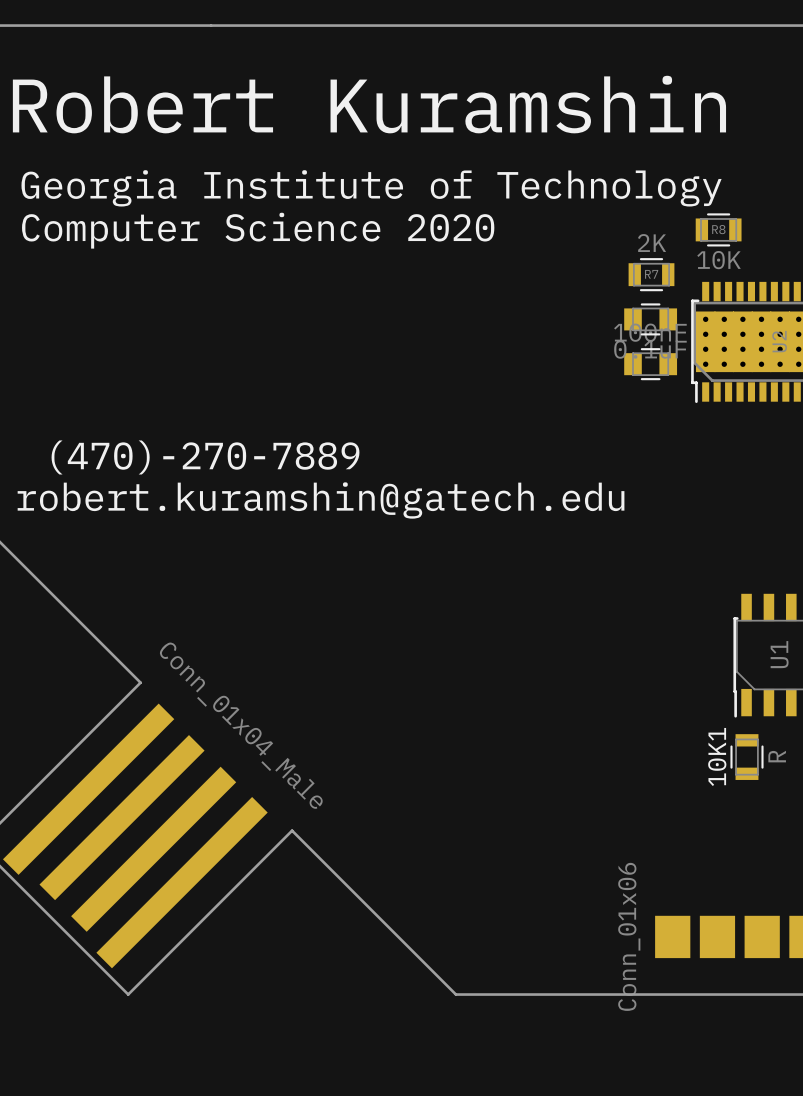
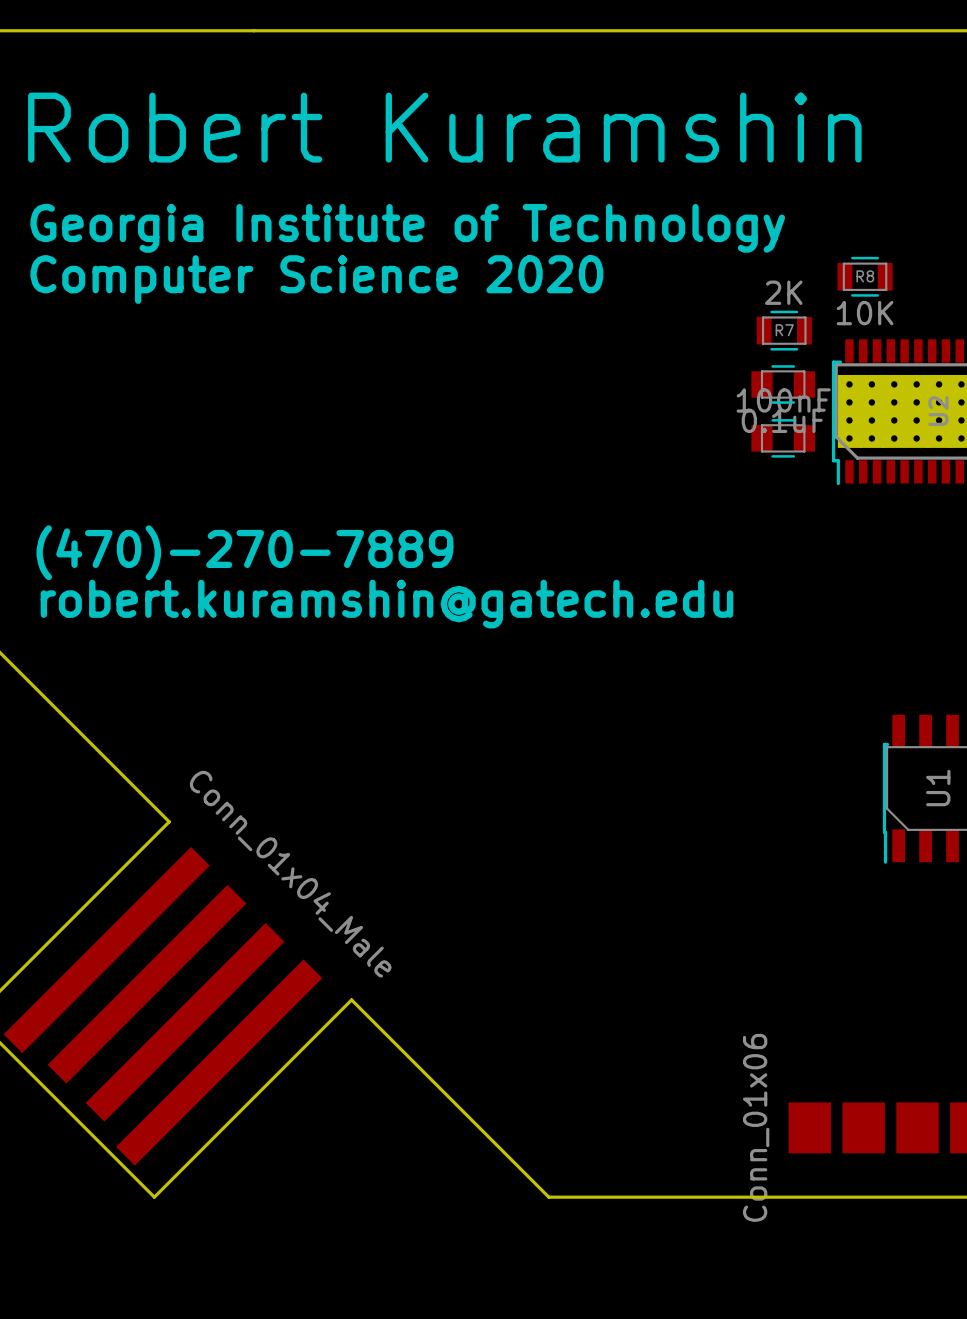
10K1: R (746, 757) -> none

